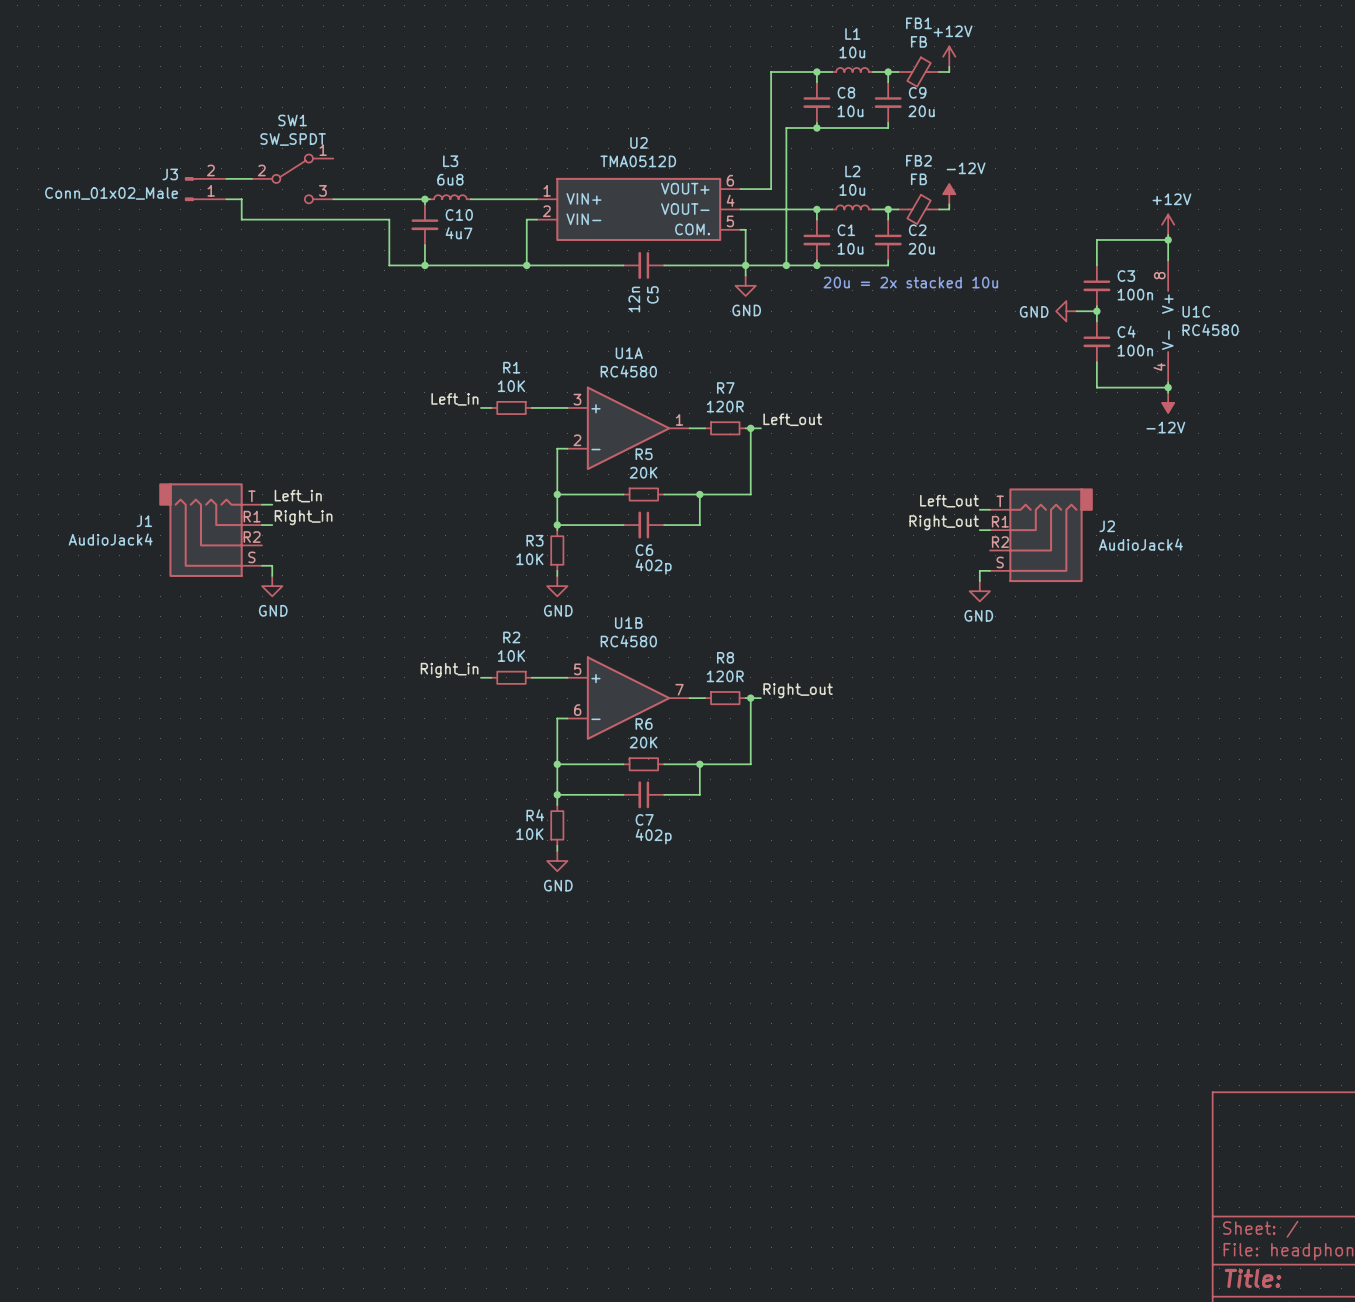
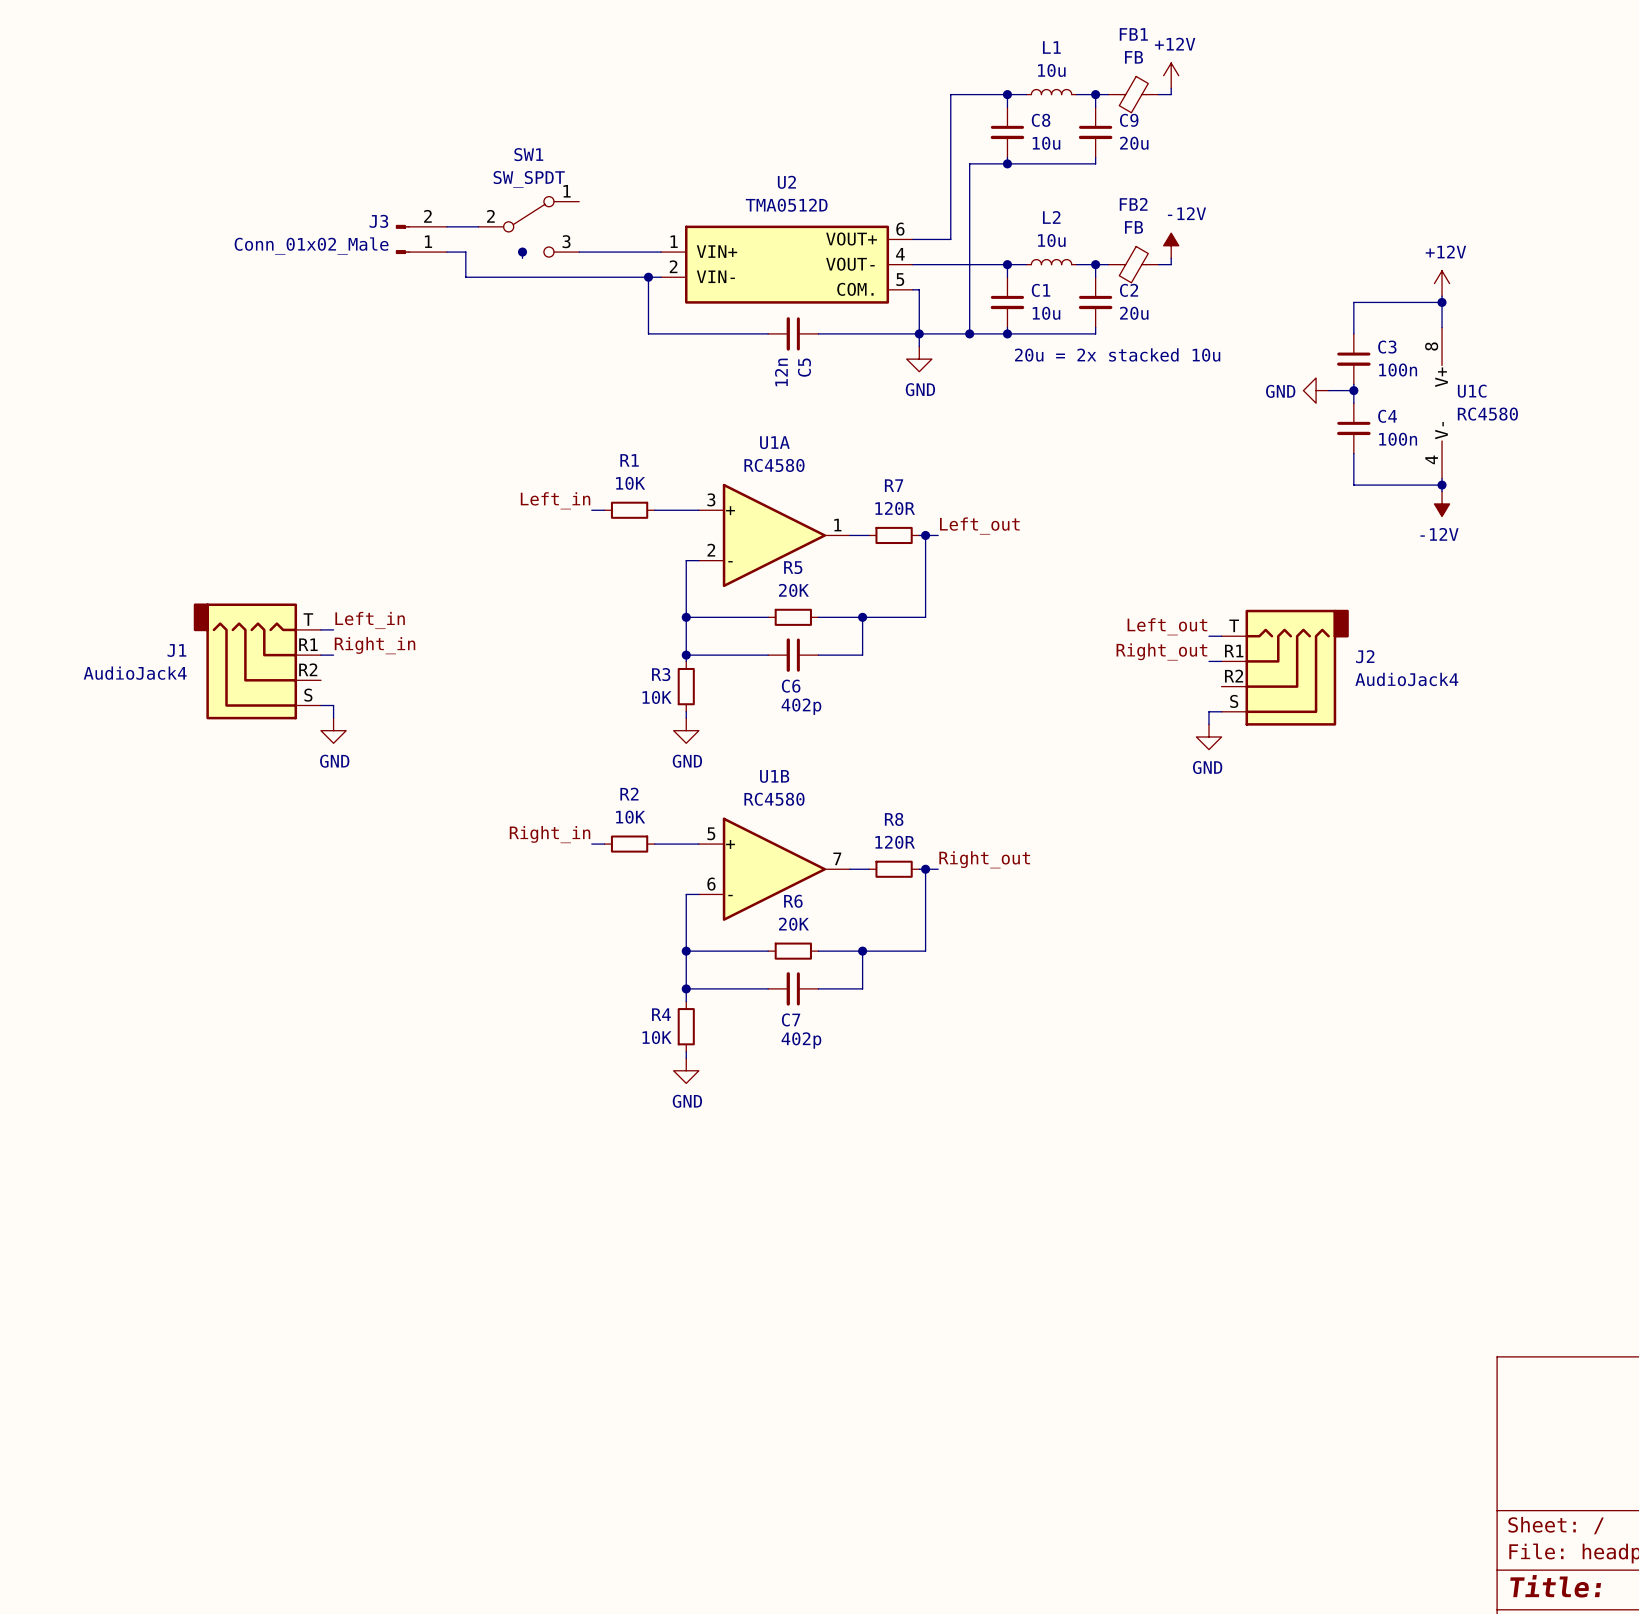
wire: (226, 178) (251, 178) -> (446, 226) (478, 226)
SW1 position: (292, 178) -> (528, 226)
J3 position: (205, 189) -> (421, 239)
L3: 6u8 (450, 197) -> none
wire: (226, 199) (241, 199) (241, 219) (379, 219) -> none
wire: (379, 199) (430, 199) -> (465, 252) (465, 277)
wire: (389, 219) (389, 265) (526, 265) -> (478, 277) (648, 277)
C10: 4u7 (424, 224) -> none
wire: (424, 245) (424, 265) -> none
junction: (424, 265) -> none
junction position: (526, 265) -> (648, 277)

